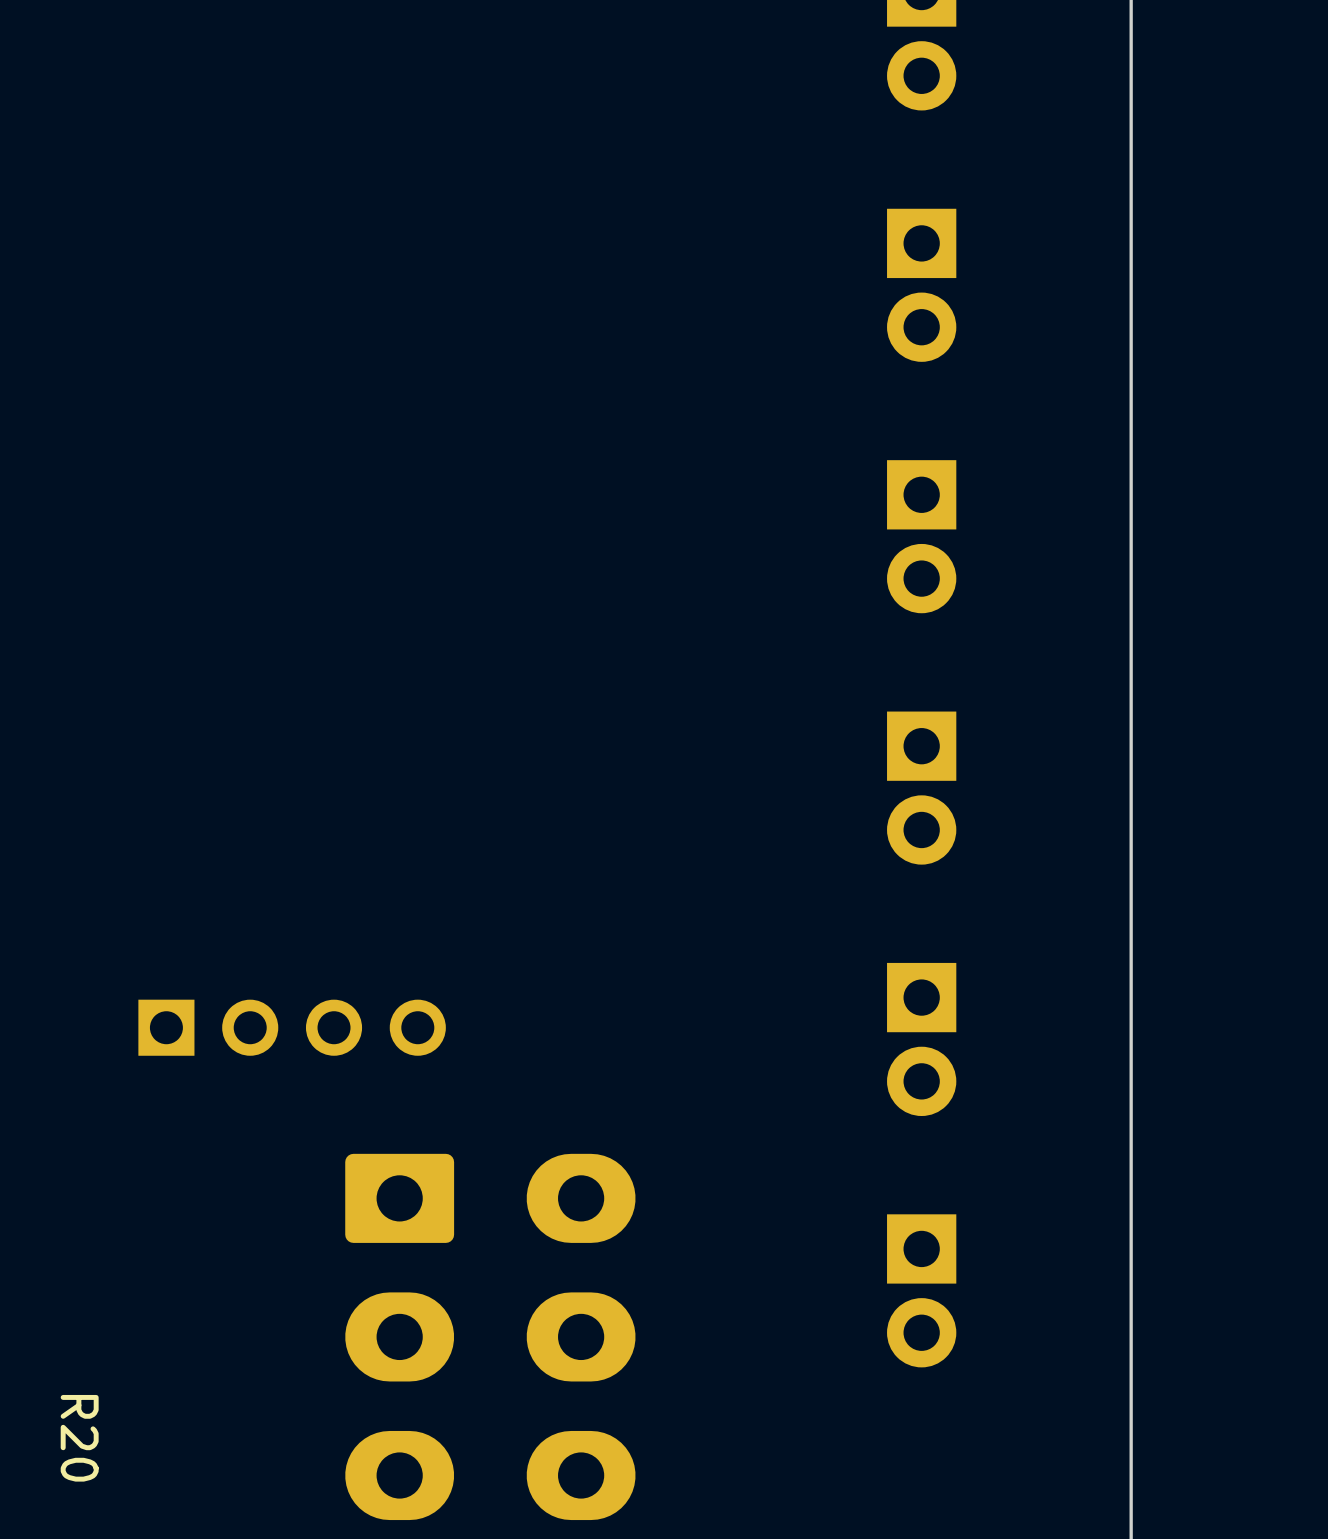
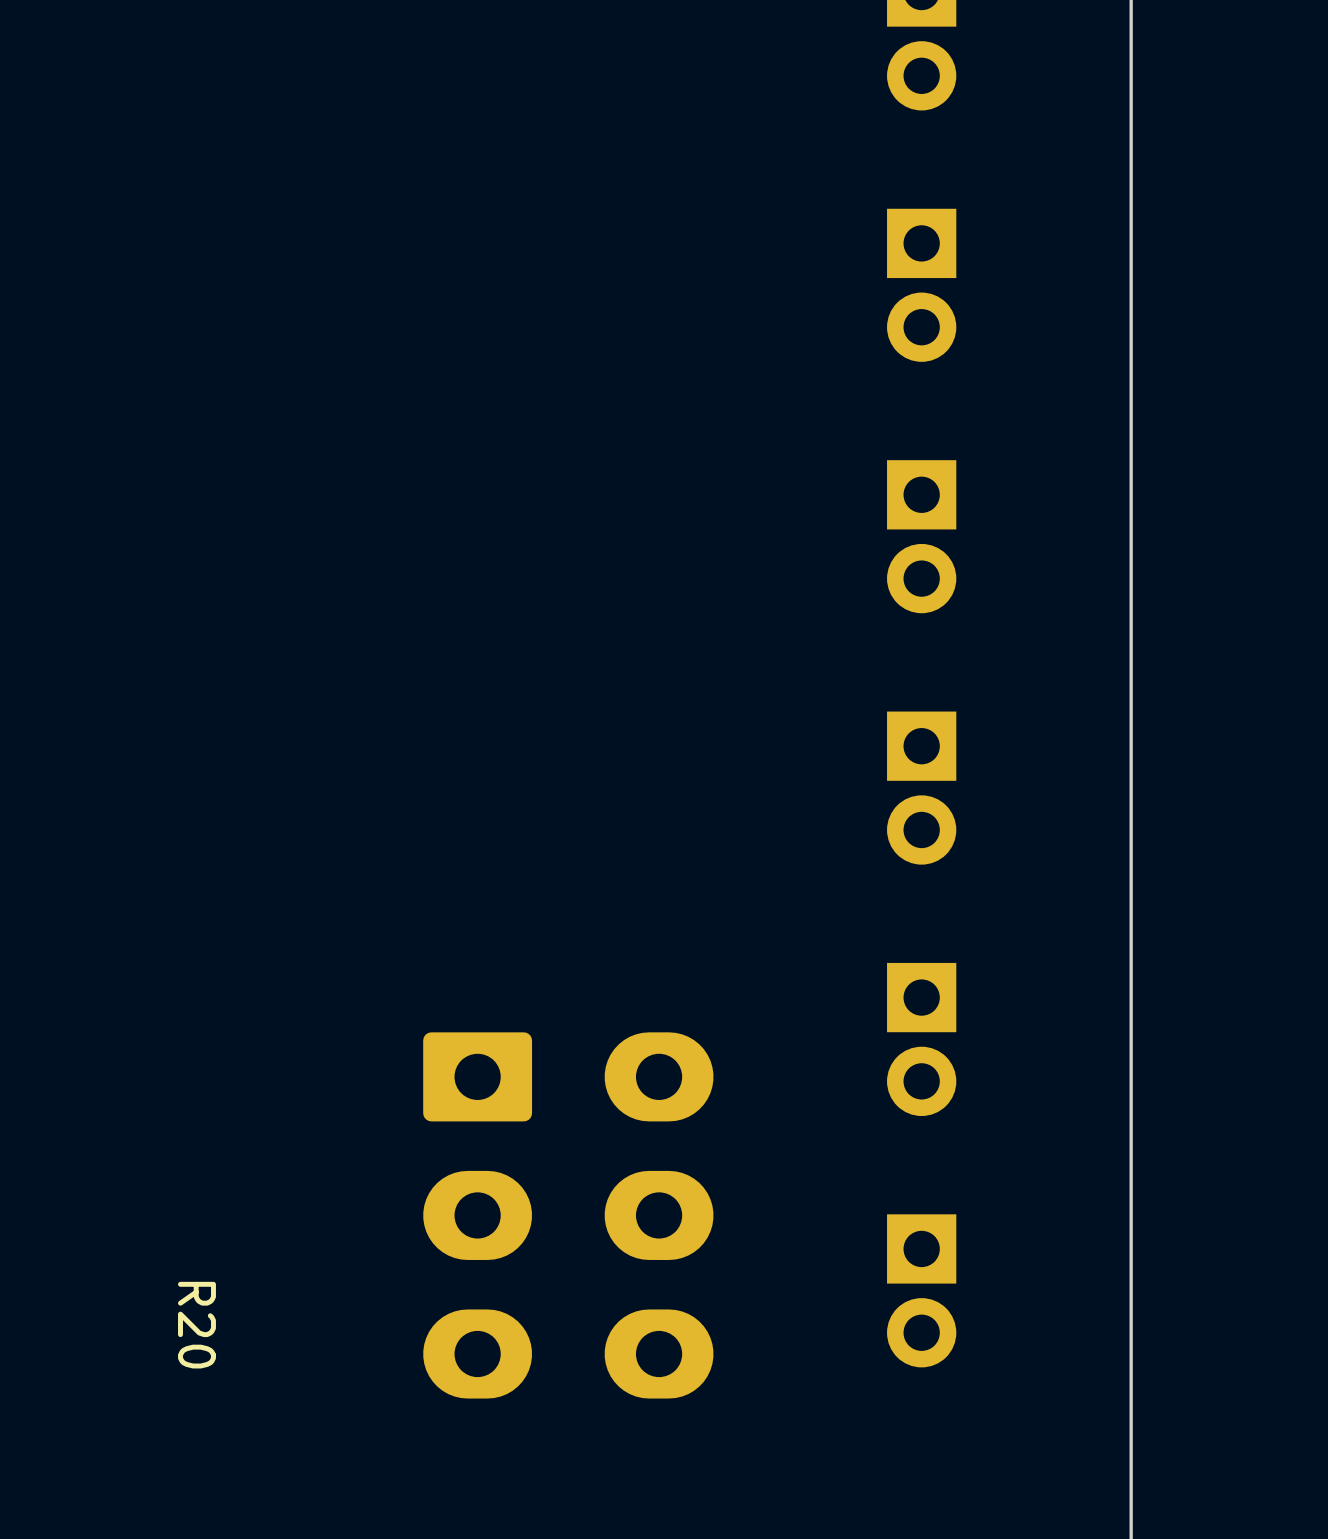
part: (292, 1027) -> none
part position: (490, 1336) -> (568, 1215)
R20 position: (79, 1438) -> (196, 1325)

